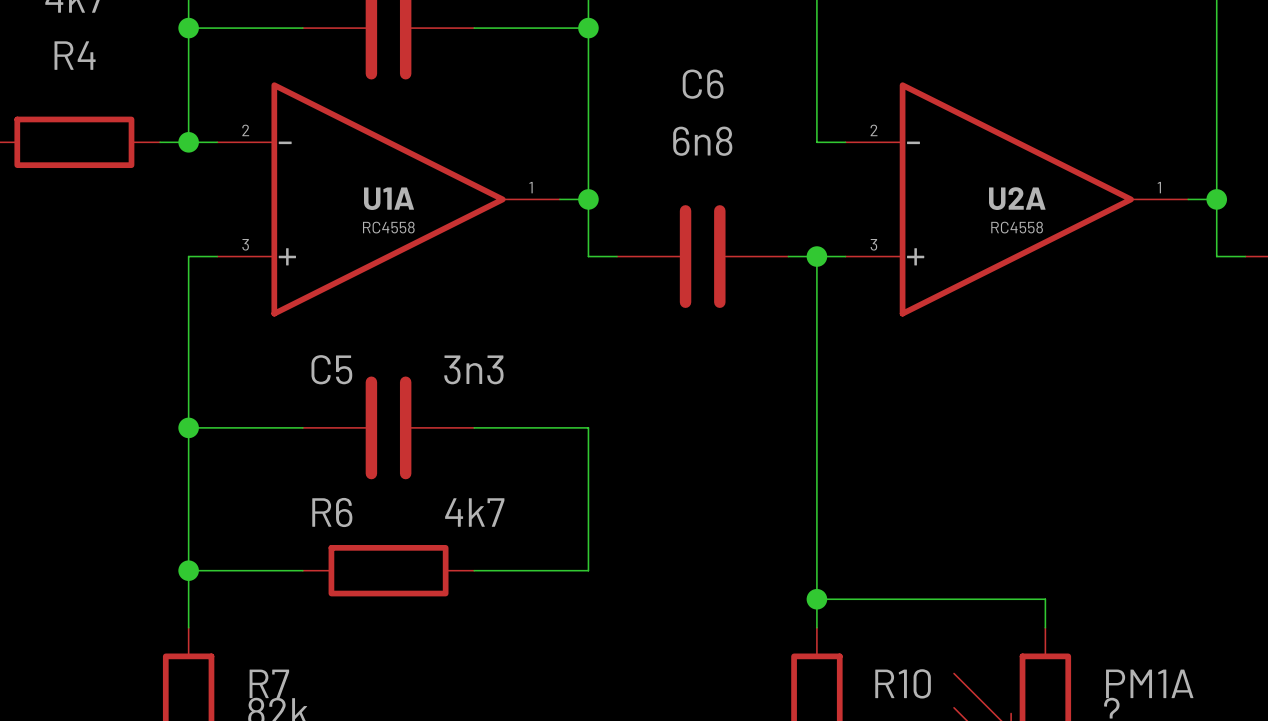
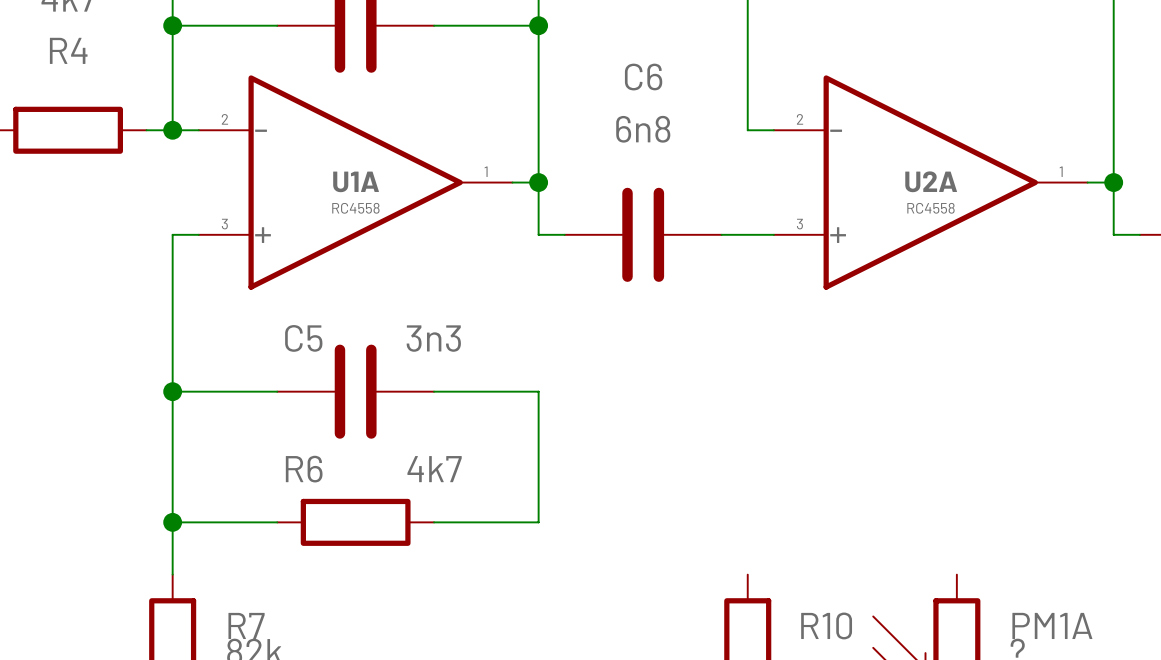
wire: (816, 256) (816, 627) -> none
junction: (816, 256) -> none
wire: (816, 599) (1045, 599) (1045, 627) -> none
junction: (816, 599) -> none

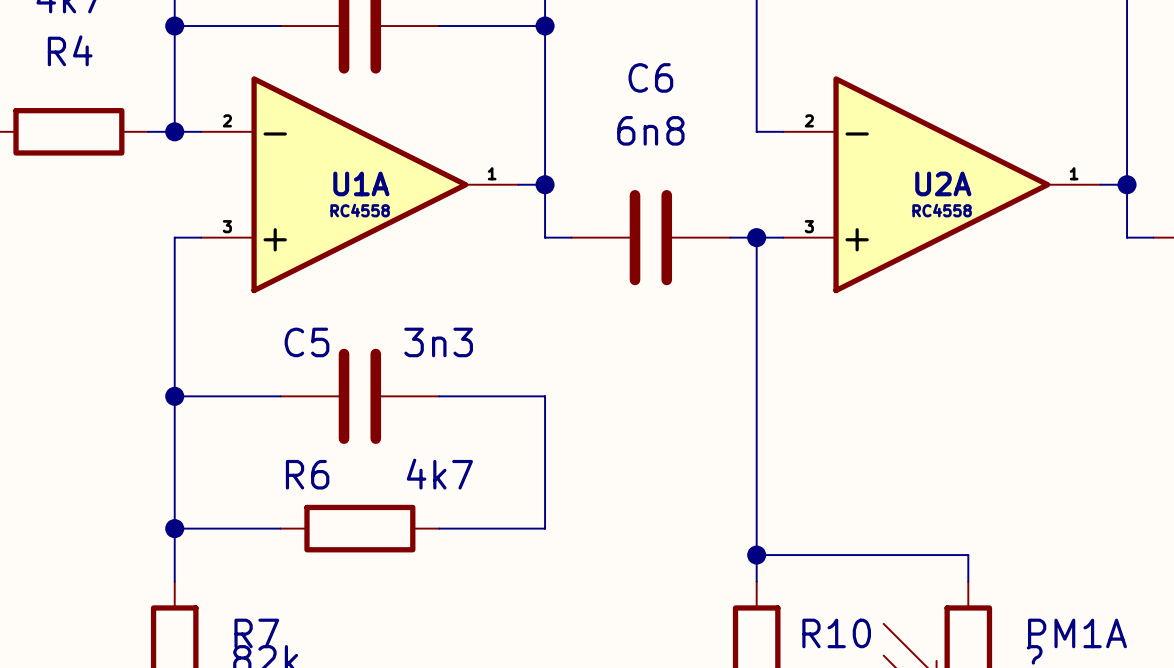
wire: none -> (756, 237) (756, 581)
junction: none -> (756, 237)
wire: none -> (756, 555) (968, 555) (968, 581)
junction: none -> (756, 555)

